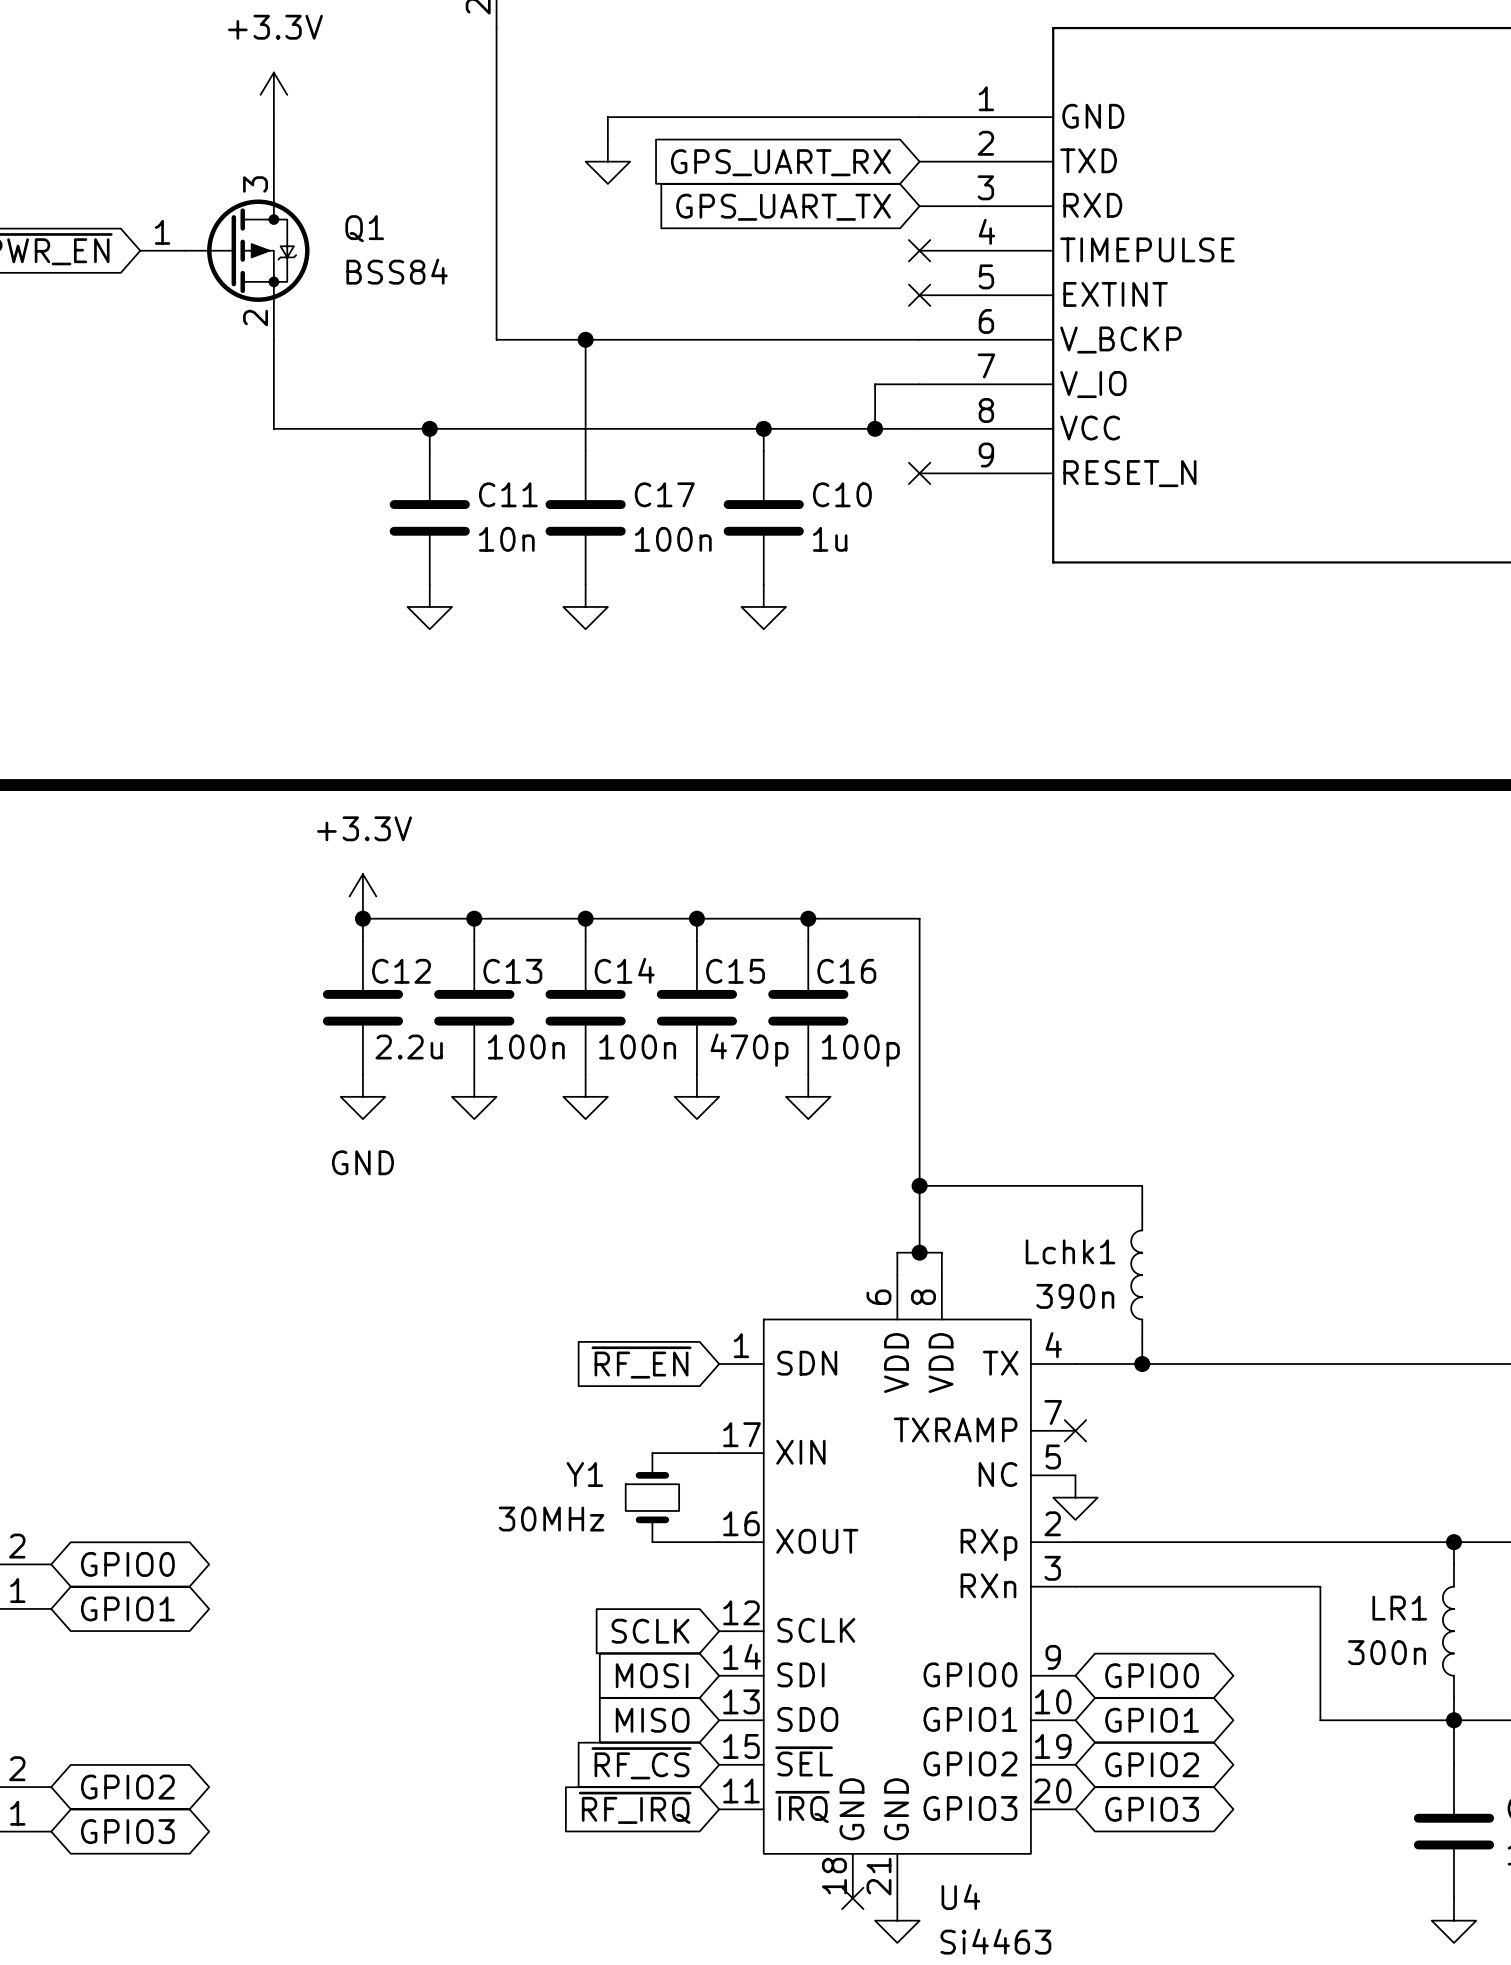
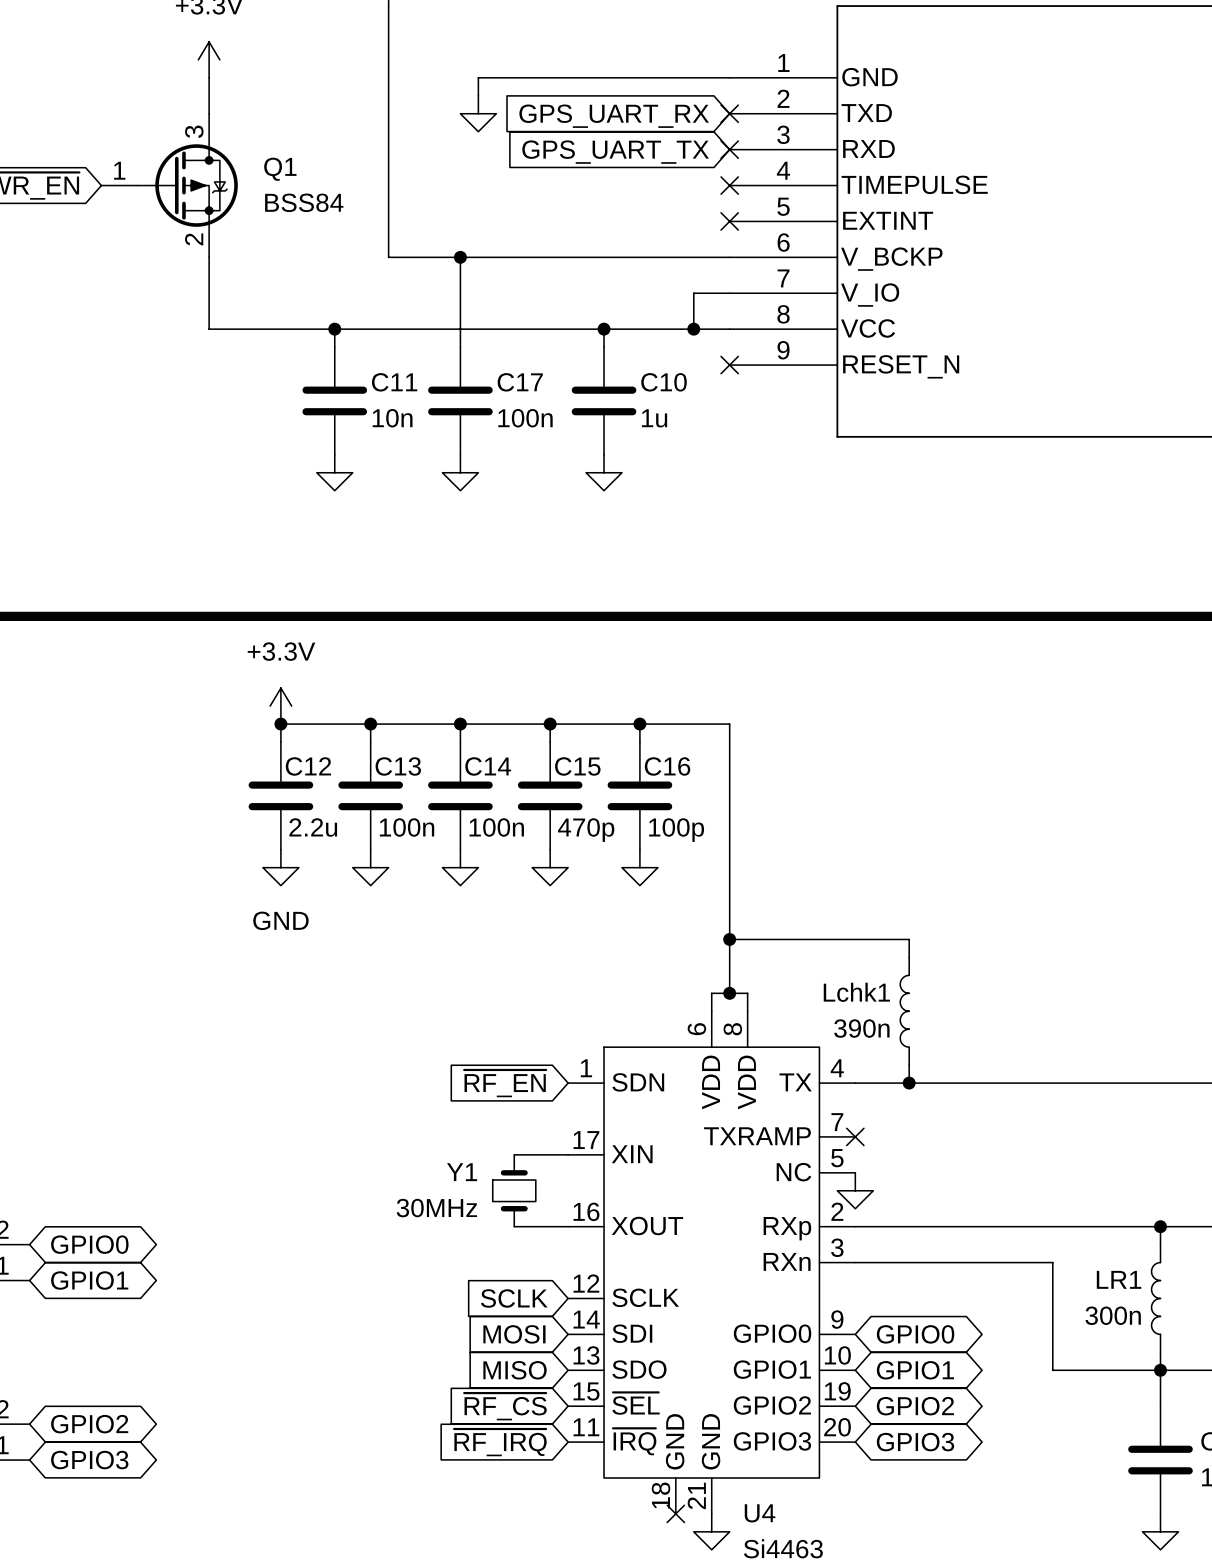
no-connect mark: none -> (729, 113)
no-connect mark: none -> (729, 149)

